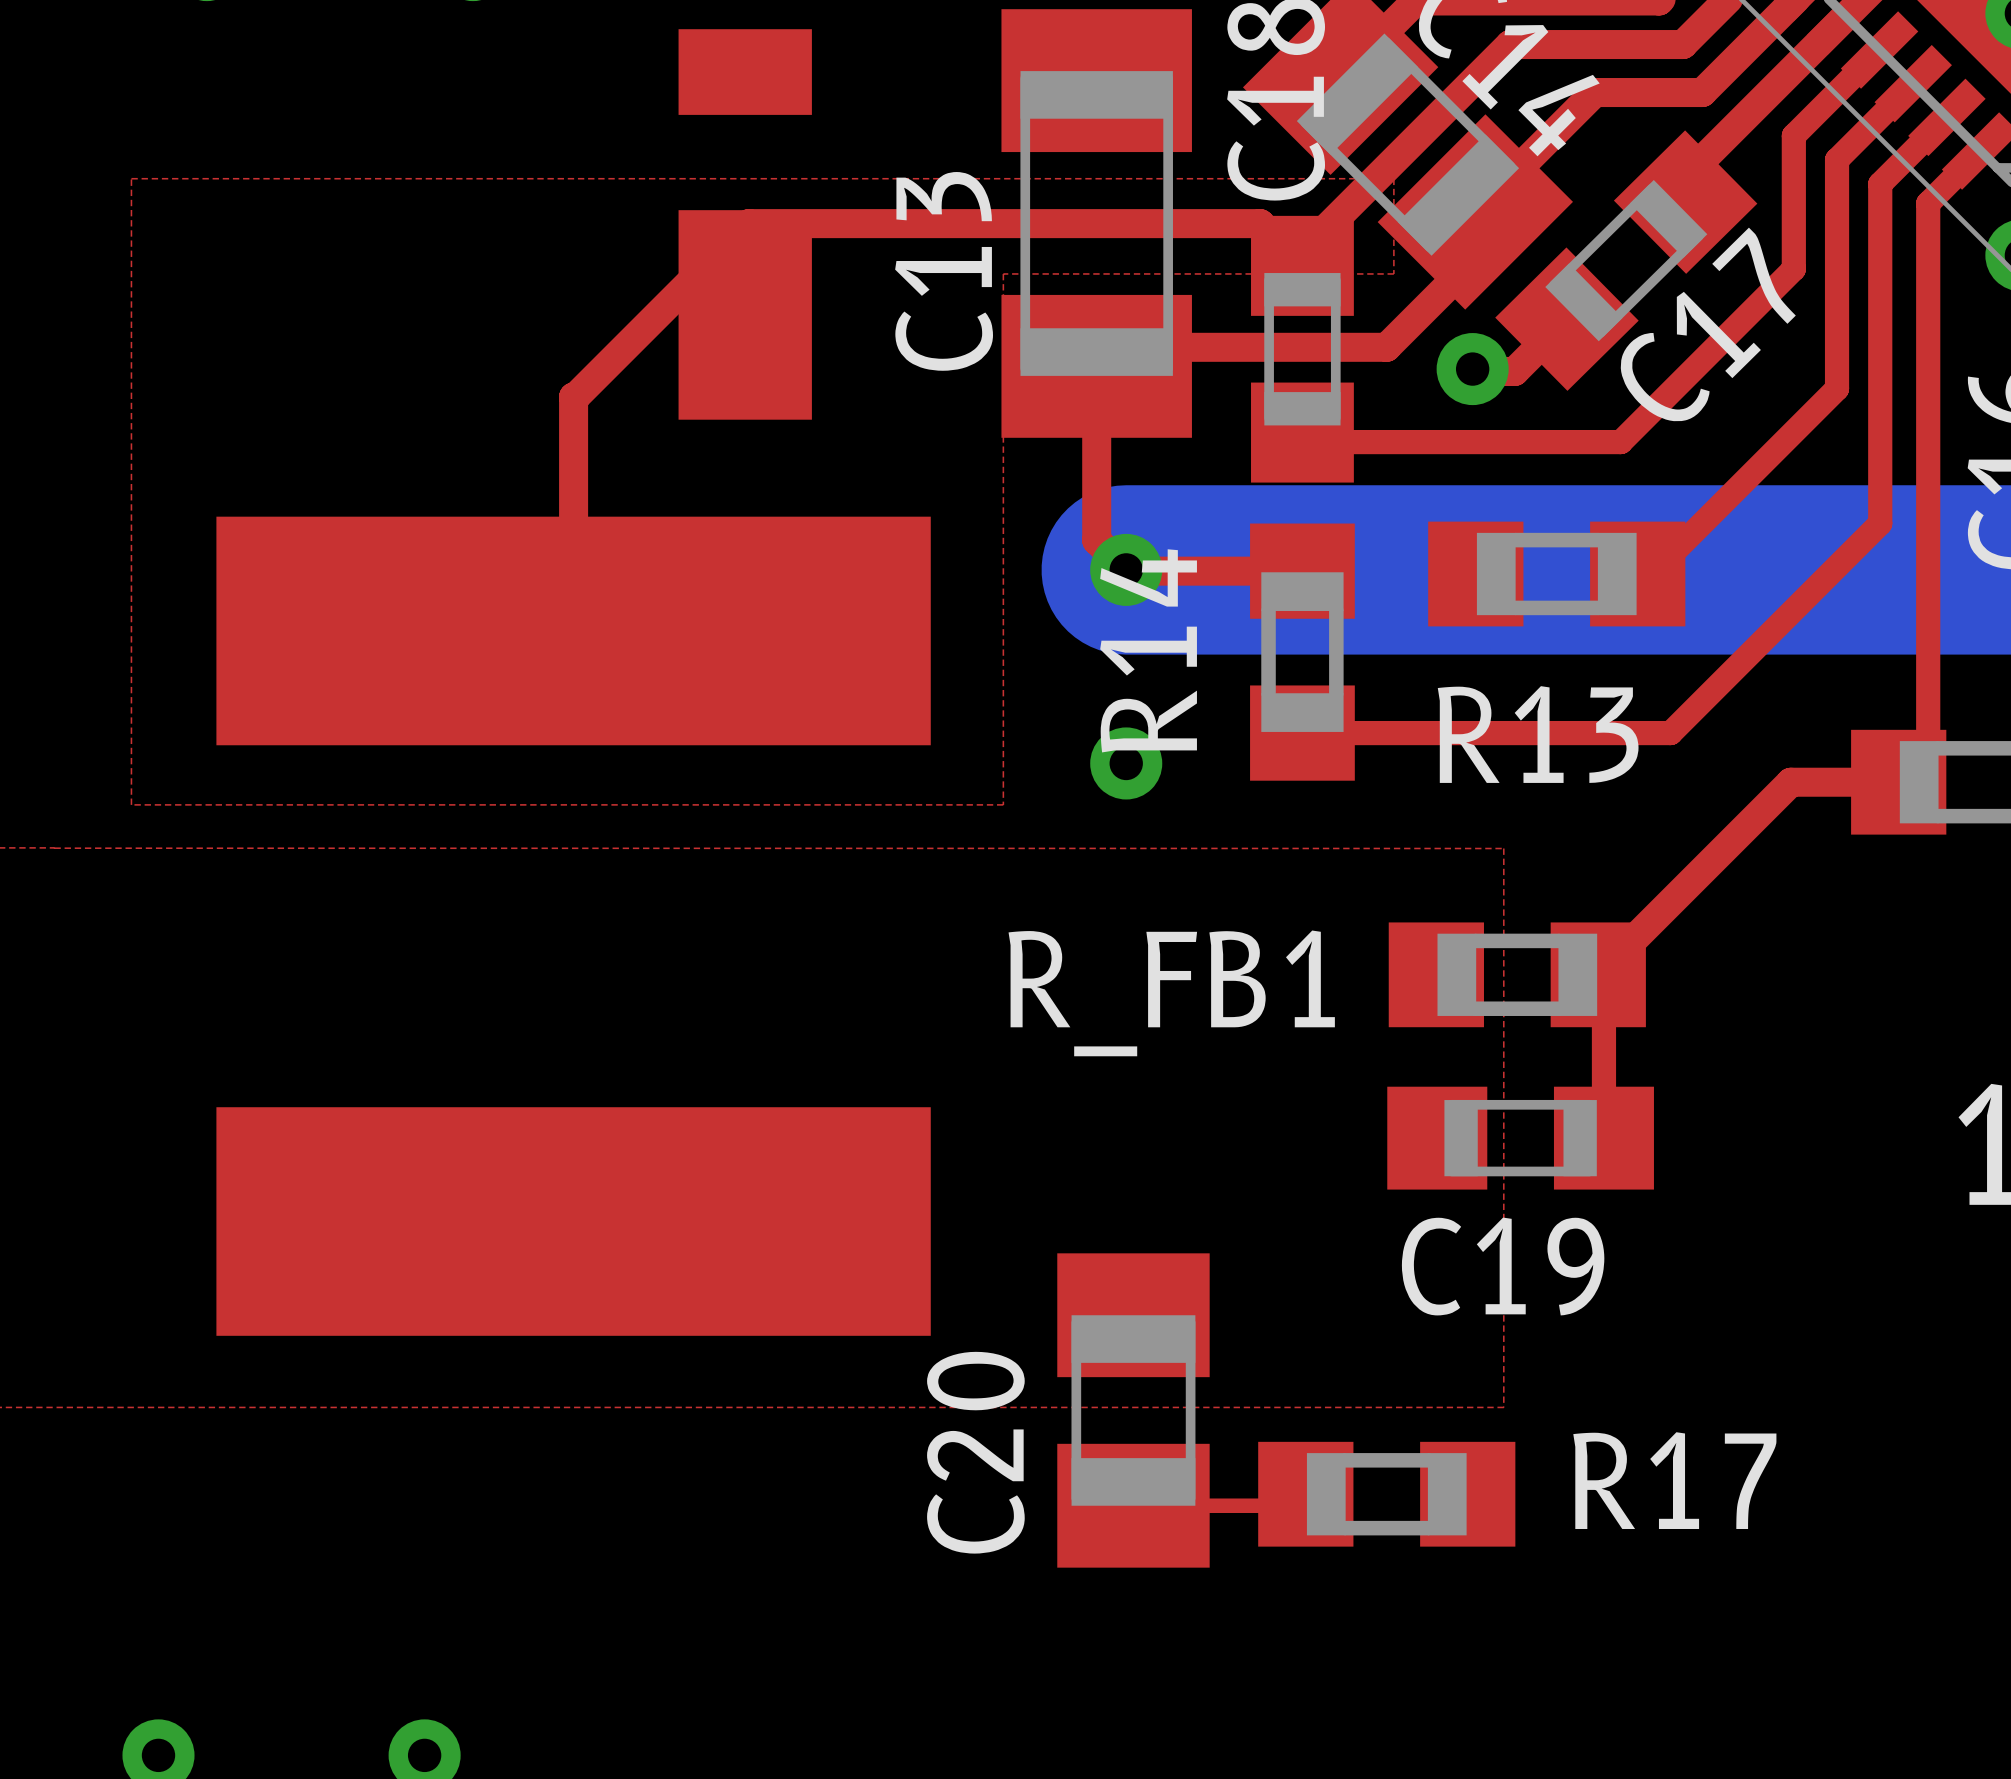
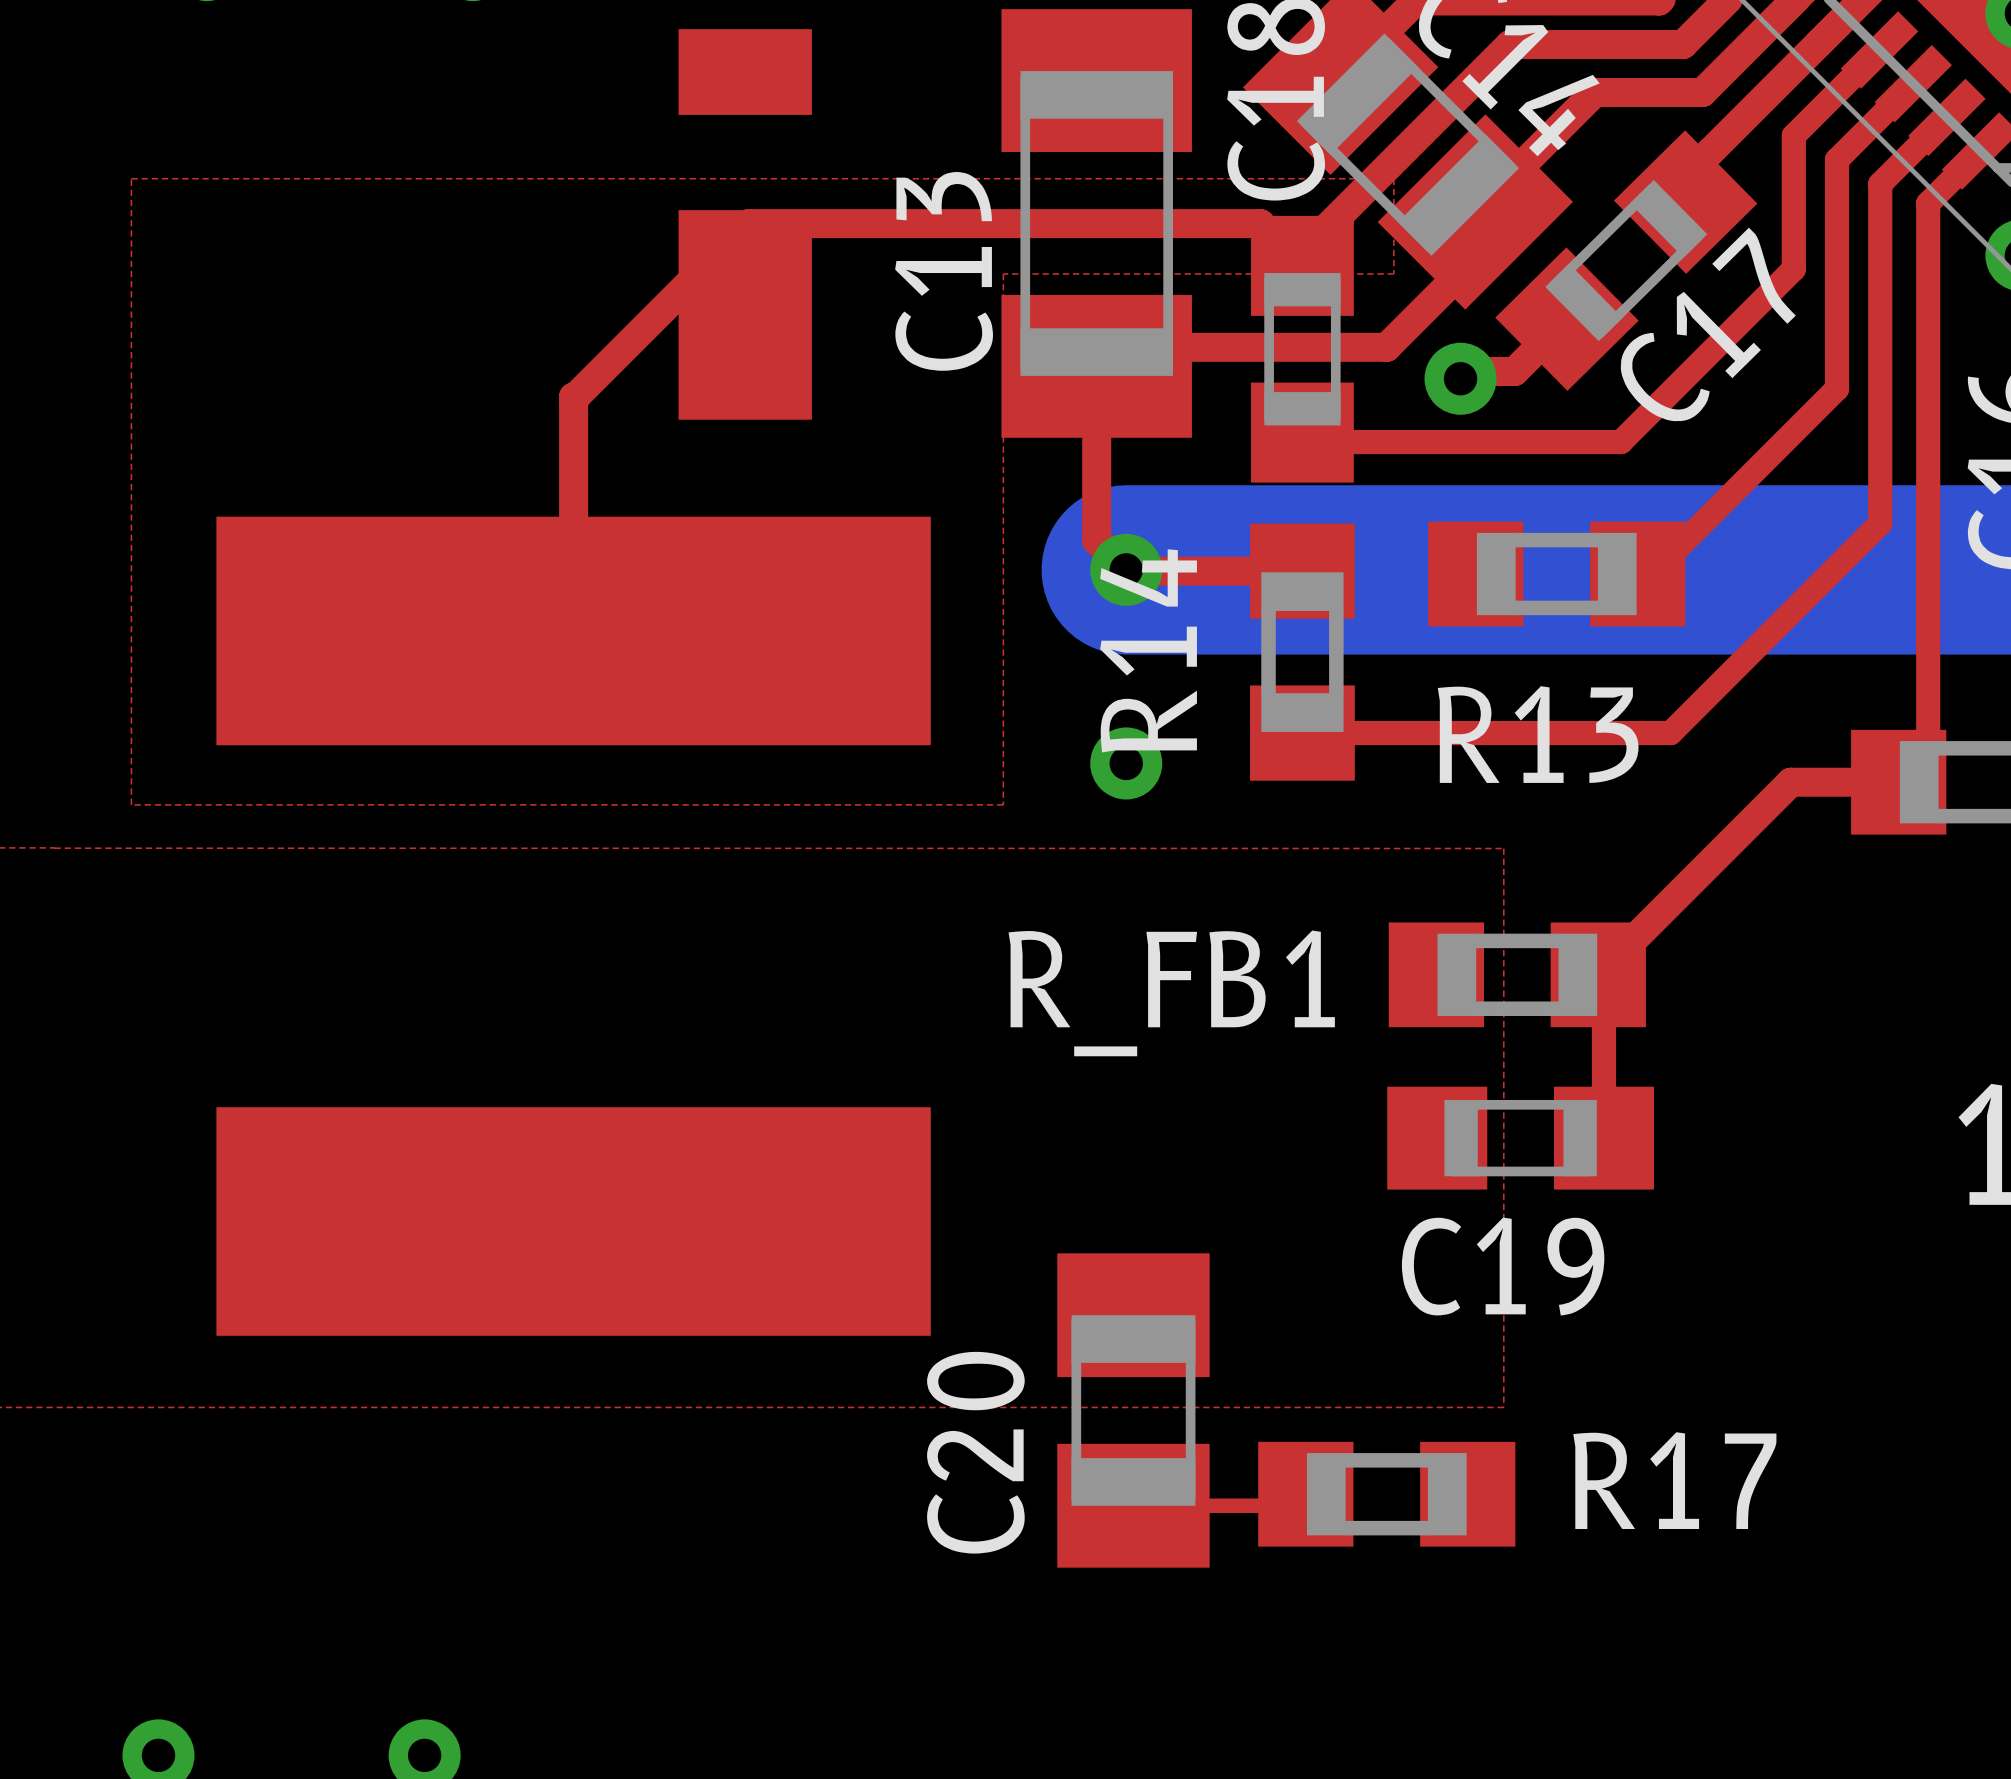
via position: (1472, 369) -> (1460, 378)

